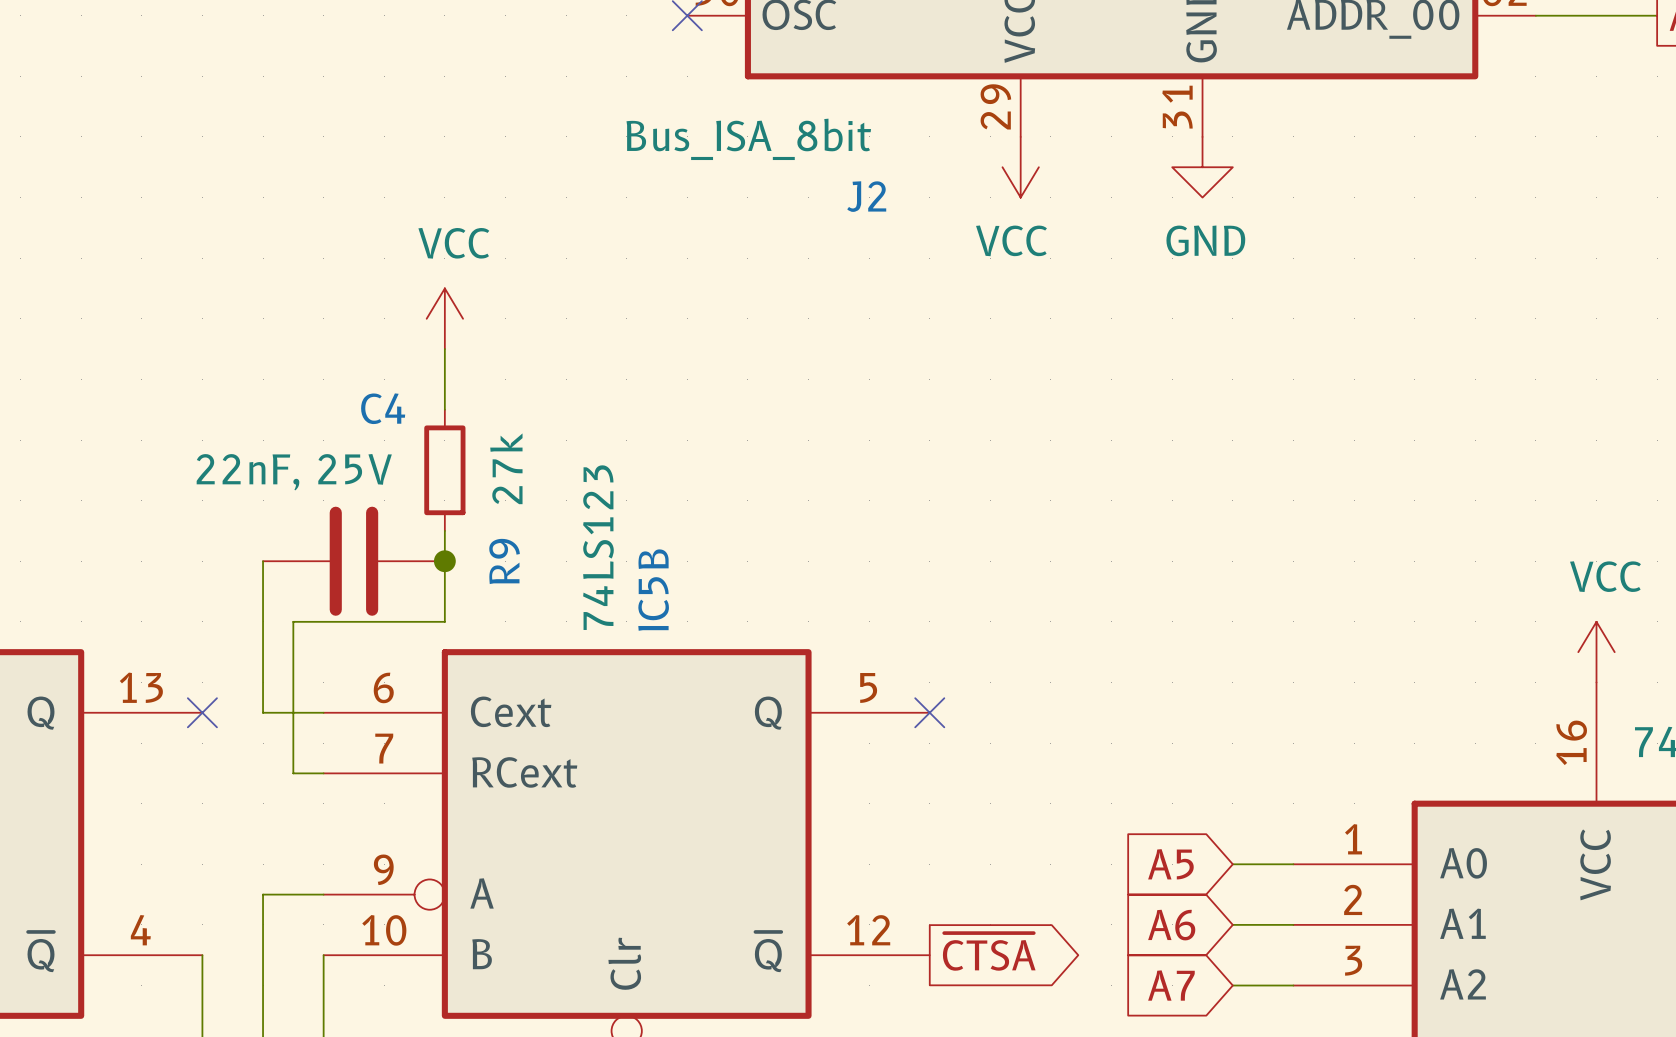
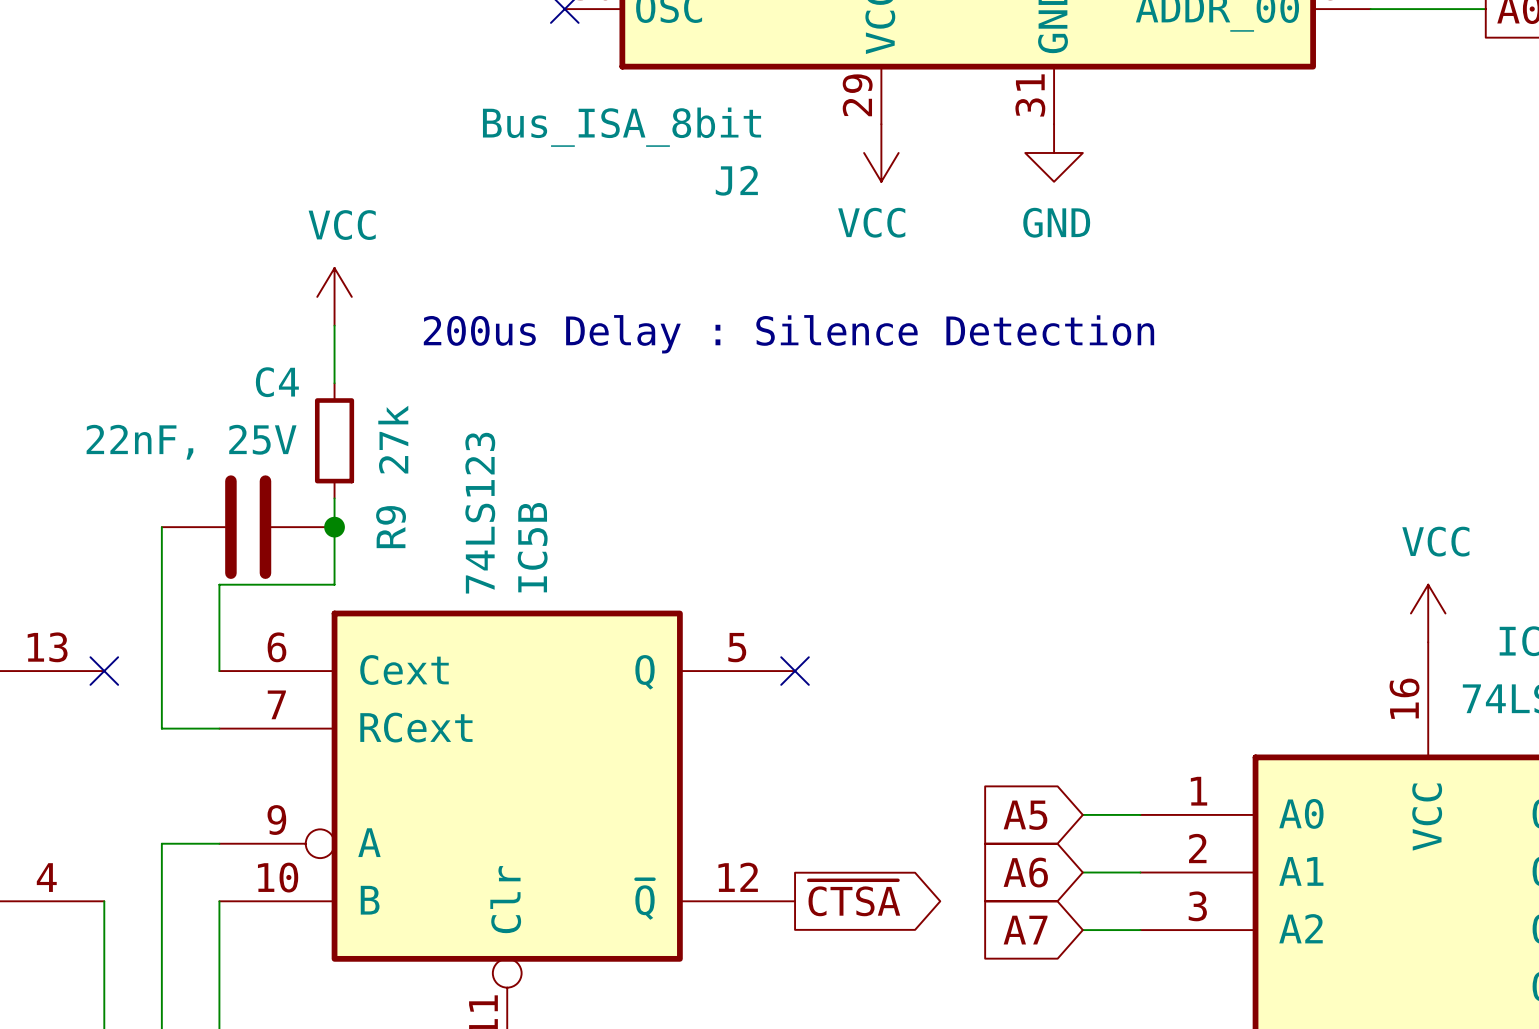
text: none -> 200us Delay : Silence Detection (788, 334)
wire: (323, 621) (293, 621) (293, 773) -> (219, 584) (219, 671)
wire: (263, 712) (323, 712) -> (161, 671) (161, 728) (190, 728)

